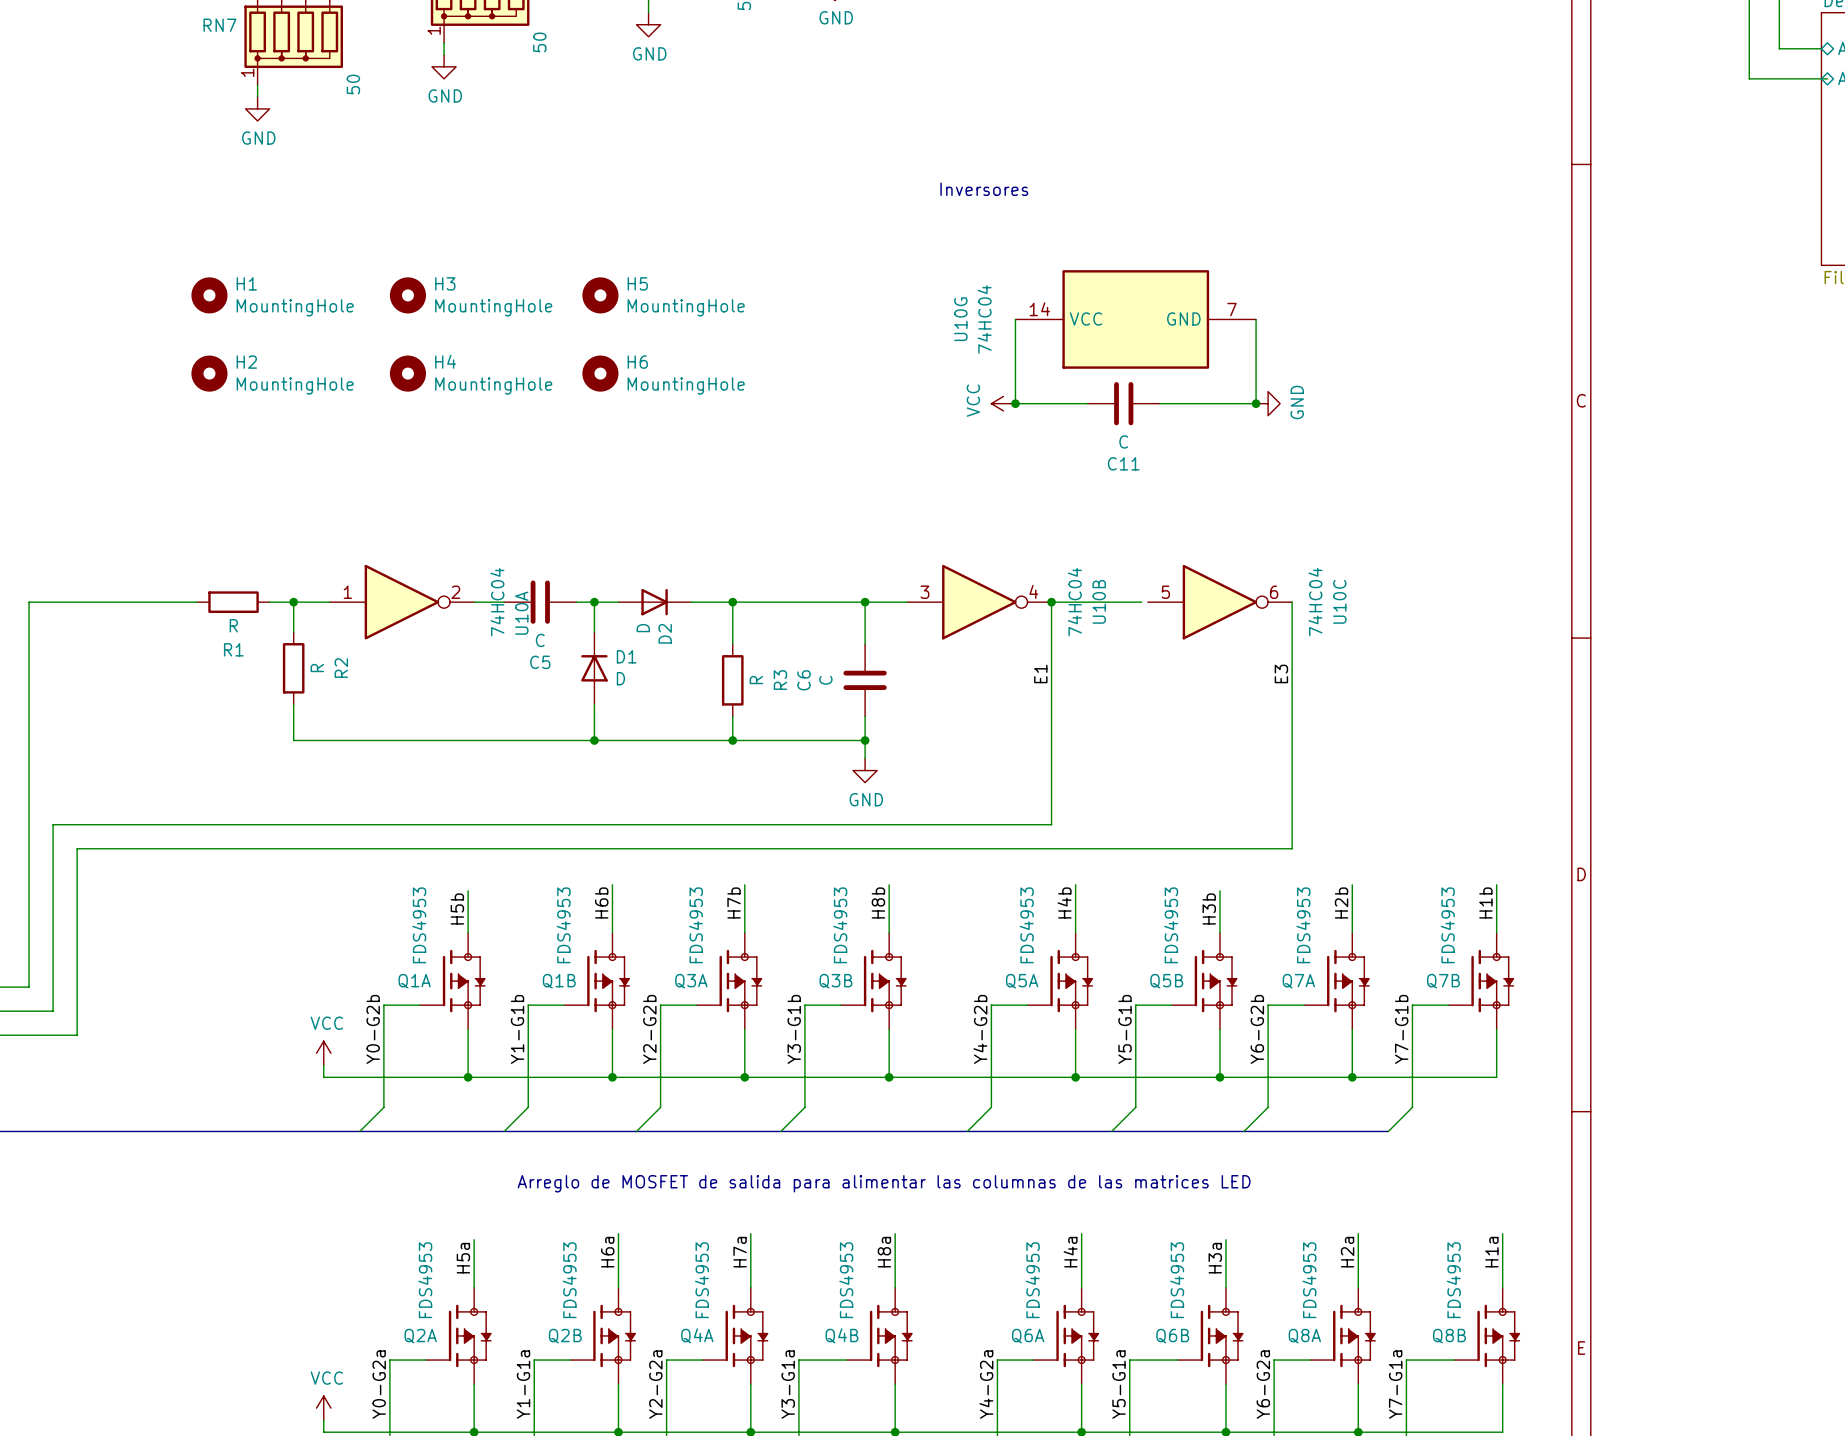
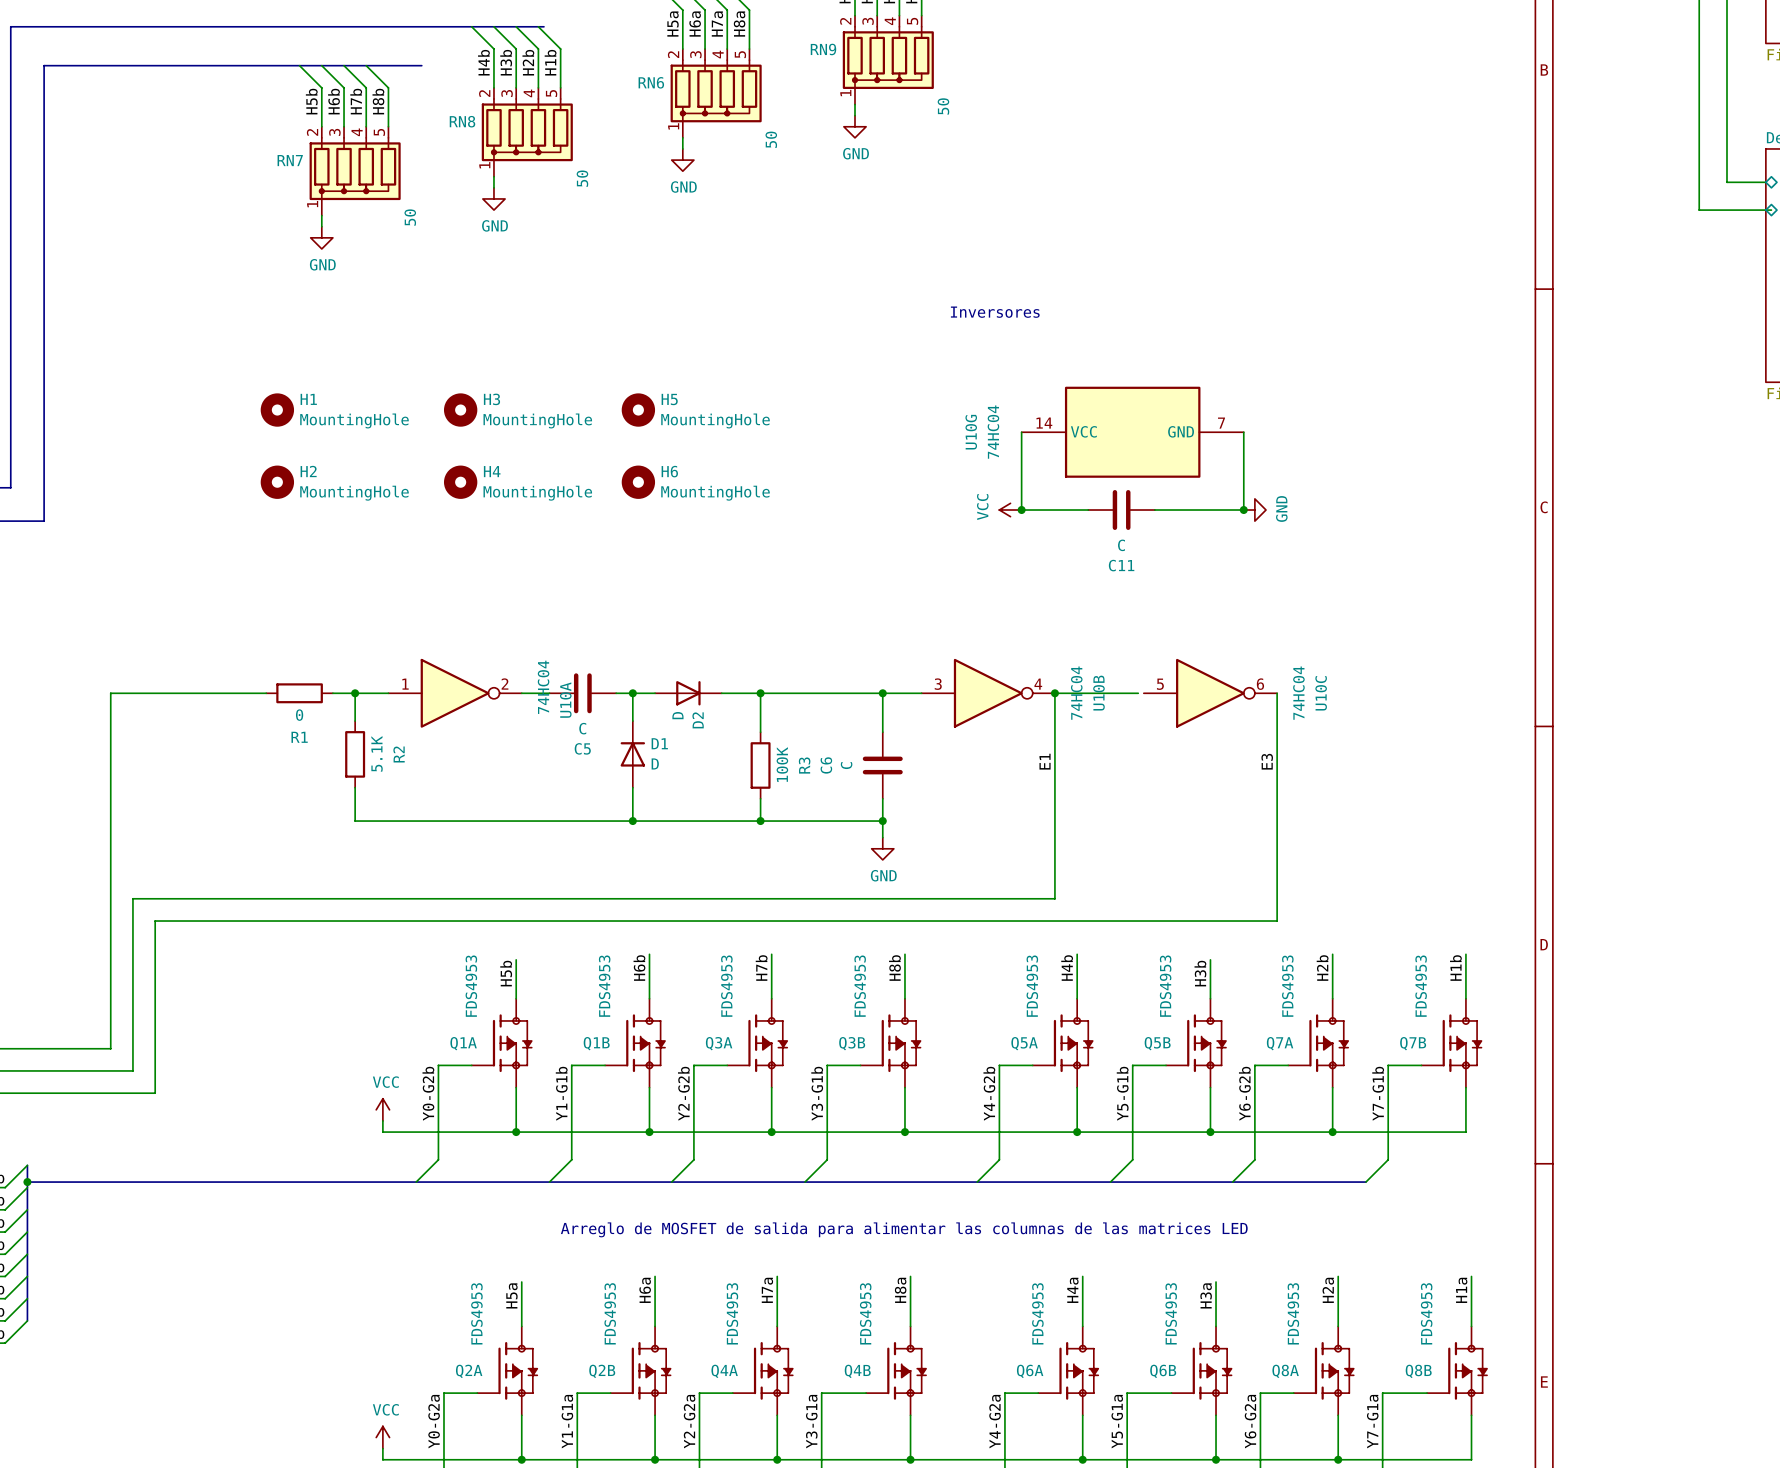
R1 value: R (233, 625) -> 0 (299, 715)
R2 value: R (317, 668) -> 5.1K (377, 753)
R3 value: R (756, 680) -> 100K (782, 764)

